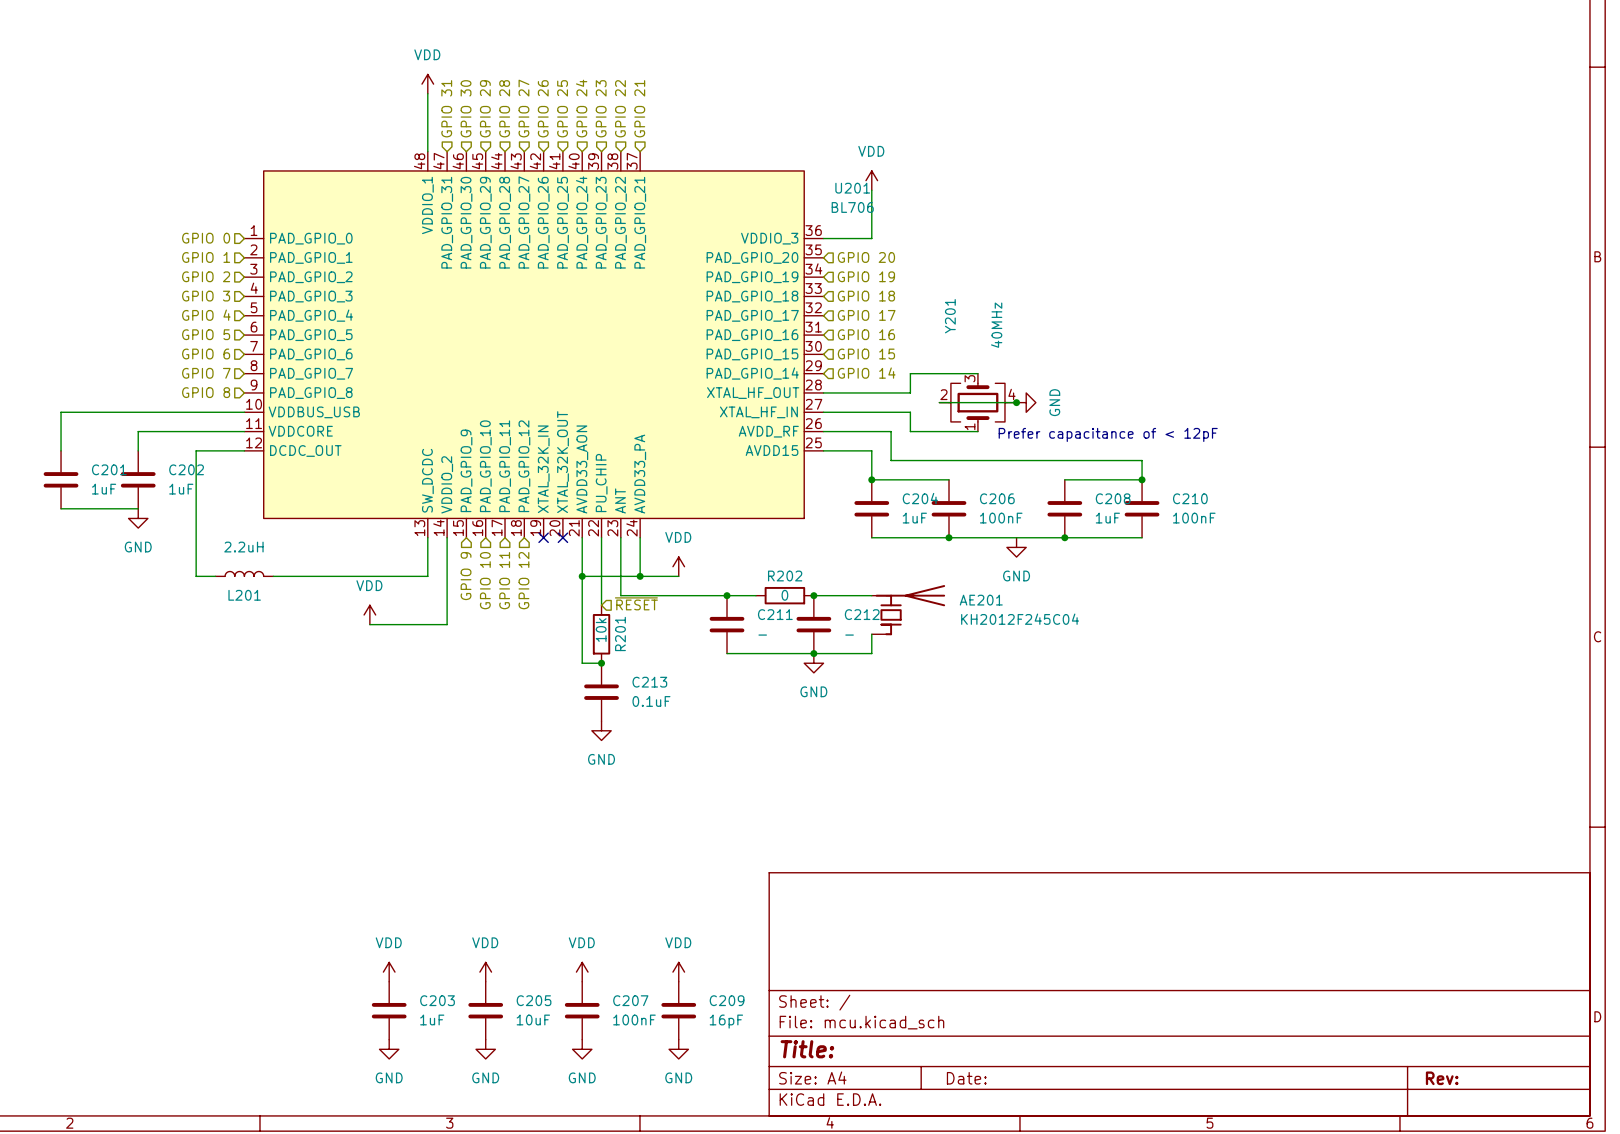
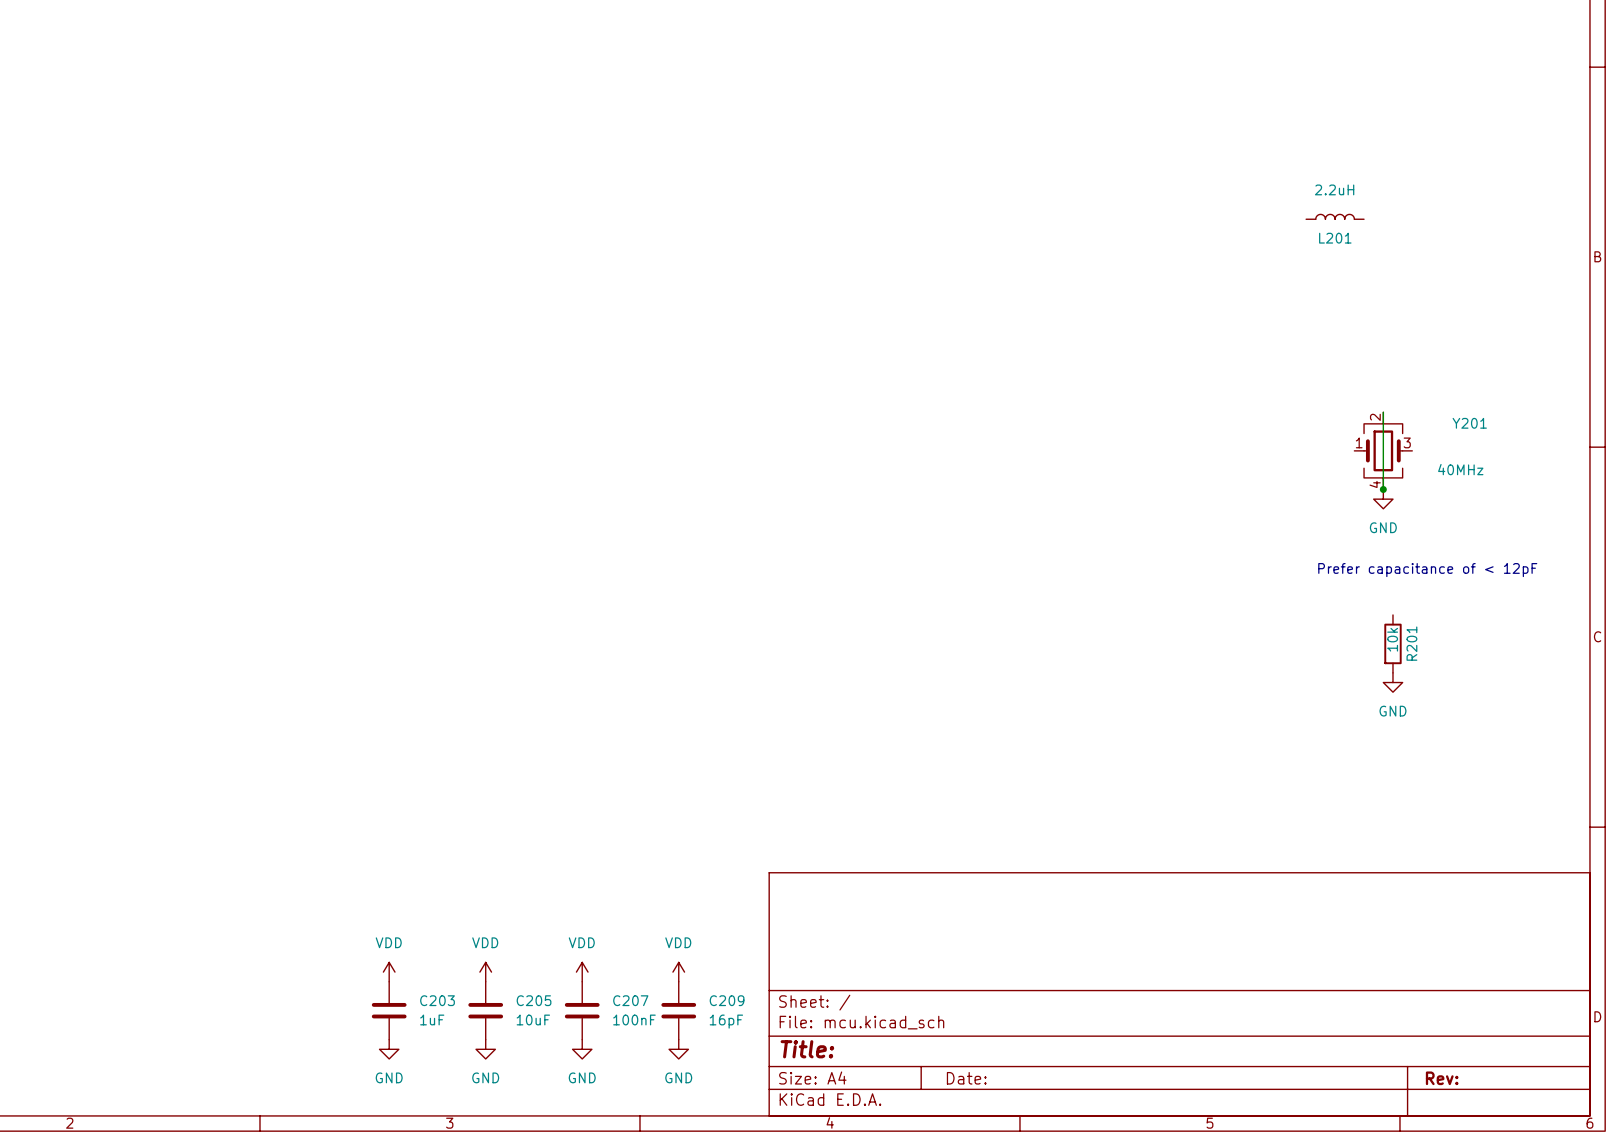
power symbol: VDD (427, 84) -> none
wire: (427, 93) (427, 151) -> none
hierarchical label: GPIO 31 (446, 108) -> none
hierarchical label: GPIO 30 (466, 108) -> none
hierarchical label: GPIO 29 (485, 108) -> none
hierarchical label: GPIO 28 (504, 108) -> none
hierarchical label: GPIO 27 (523, 108) -> none
hierarchical label: GPIO 26 (543, 108) -> none
hierarchical label: GPIO 25 (562, 108) -> none
hierarchical label: GPIO 24 (581, 108) -> none
hierarchical label: GPIO 23 (601, 108) -> none
hierarchical label: GPIO 22 (620, 108) -> none
hierarchical label: GPIO 21 (639, 108) -> none
power symbol: VDD (871, 180) -> none
wire: (871, 190) (871, 238) (823, 238) -> none
hierarchical label: GPIO 0 (206, 238) -> none
hierarchical label: GPIO 1 (206, 257) -> none
hierarchical label: GPIO 20 (866, 257) -> none
hierarchical label: GPIO 2 (206, 276) -> none
hierarchical label: GPIO 19 (866, 276) -> none
hierarchical label: GPIO 3 (206, 296) -> none
hierarchical label: GPIO 18 (866, 296) -> none
hierarchical label: GPIO 4 (206, 315) -> none
hierarchical label: GPIO 17 (866, 315) -> none
hierarchical label: GPIO 5 (206, 334) -> none
hierarchical label: GPIO 16 (866, 334) -> none
U201: BL706 (534, 345) -> none
hierarchical label: GPIO 6 (206, 354) -> none
hierarchical label: GPIO 15 (866, 354) -> none
hierarchical label: GPIO 7 (206, 373) -> none
hierarchical label: GPIO 14 (866, 373) -> none
wire: (977, 373) (910, 373) (910, 392) (823, 392) -> none
hierarchical label: GPIO 8 (206, 392) -> none
wire: (939, 402) (1016, 402) -> none
Y201 rotation: 0° (977, 402) -> 90° clockwise (1383, 450)
Y201 position: (977, 402) -> (1383, 450)
junction: (1016, 402) -> none
power symbol: GND (1026, 402) -> none
wire: (244, 412) (61, 412) (61, 450) -> none
wire: (823, 412) (910, 412) (910, 431) (977, 431) -> none
wire: none -> (1383, 412) (1383, 489)
wire: (244, 431) (138, 431) (138, 450) -> none
wire: (823, 431) (891, 431) (891, 460) (1142, 460) (1142, 479) (1064, 479) -> none
text position: Prefer capacitance of < 12pF (1108, 434) -> Prefer capacitance of < 12pF (1427, 570)
wire: (244, 450) (196, 450) (196, 576) (215, 576) -> none
wire: (823, 450) (871, 450) (871, 479) (949, 479) -> none
C201: 1uF (61, 479) -> none
C202: 1uF (138, 479) -> none
junction: (871, 479) -> none
junction: (1142, 479) -> none
junction: none -> (1383, 489)
power symbol: none -> GND (1383, 499)
wire: (61, 508) (138, 508) -> none
C204: 1uF (871, 508) -> none
C206: 100nF (949, 508) -> none
C208: 1uF (1064, 508) -> none
C210: 100nF (1142, 508) -> none
power symbol: GND (138, 518) -> none
wire: (427, 537) (427, 576) (273, 576) -> none
wire: (447, 537) (447, 624) (369, 624) -> none
no-connect mark: (543, 537) -> none
no-connect mark: (562, 537) -> none
wire: (582, 537) (582, 663) (601, 663) -> none
wire: (601, 537) (601, 605) -> none
wire: (620, 537) (620, 595) (755, 595) -> none
wire: (640, 537) (640, 576) -> none
wire: (871, 537) (1142, 537) -> none
junction: (949, 537) -> none
junction: (1064, 537) -> none
power symbol: GND (1016, 547) -> none
power symbol: VDD (678, 566) -> none
L201 position: (244, 573) -> (1335, 216)
hierarchical label: GPIO 9 (466, 576) -> none
wire: (582, 576) (678, 576) -> none
junction: (582, 576) -> none
junction: (640, 576) -> none
hierarchical label: GPIO 10 (485, 580) -> none
hierarchical label: GPIO 11 (504, 580) -> none
hierarchical label: GPIO 12 (523, 580) -> none
junction: (727, 595) -> none
R202: 0 (784, 595) -> none
wire: (813, 595) (871, 595) -> none
junction: (813, 595) -> none
hierarchical label: ~{RESET} (636, 603) -> none
AE201: KH2012F245C04 (908, 610) -> none
power symbol: VDD (369, 614) -> none
C211: - (727, 624) -> none
C212: - (813, 624) -> none
R201 position: (601, 634) -> (1392, 643)
wire: (871, 634) (871, 653) (727, 653) -> none
junction: (813, 653) -> none
junction: (601, 663) -> none
power symbol: GND (813, 663) -> none
power symbol: none -> GND (1392, 682)
C213: 0.1uF (601, 692) -> none
power symbol: GND (601, 730) -> none

